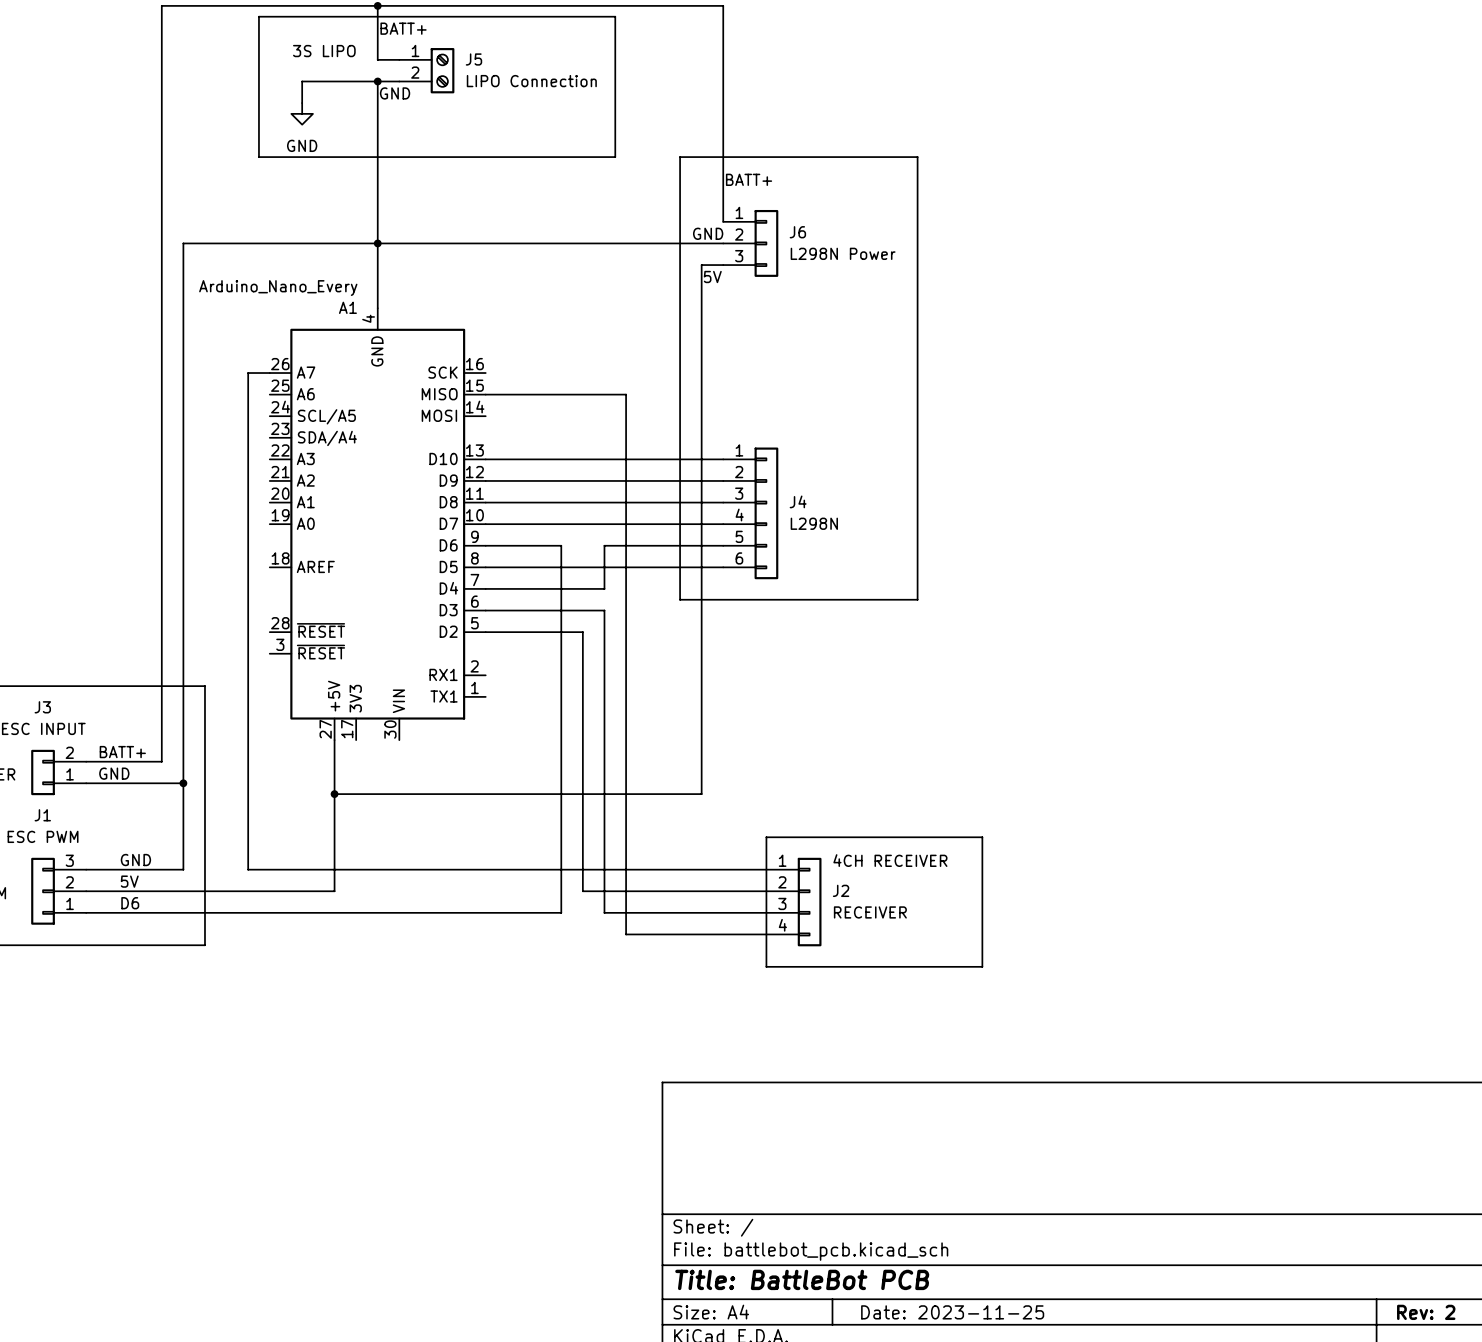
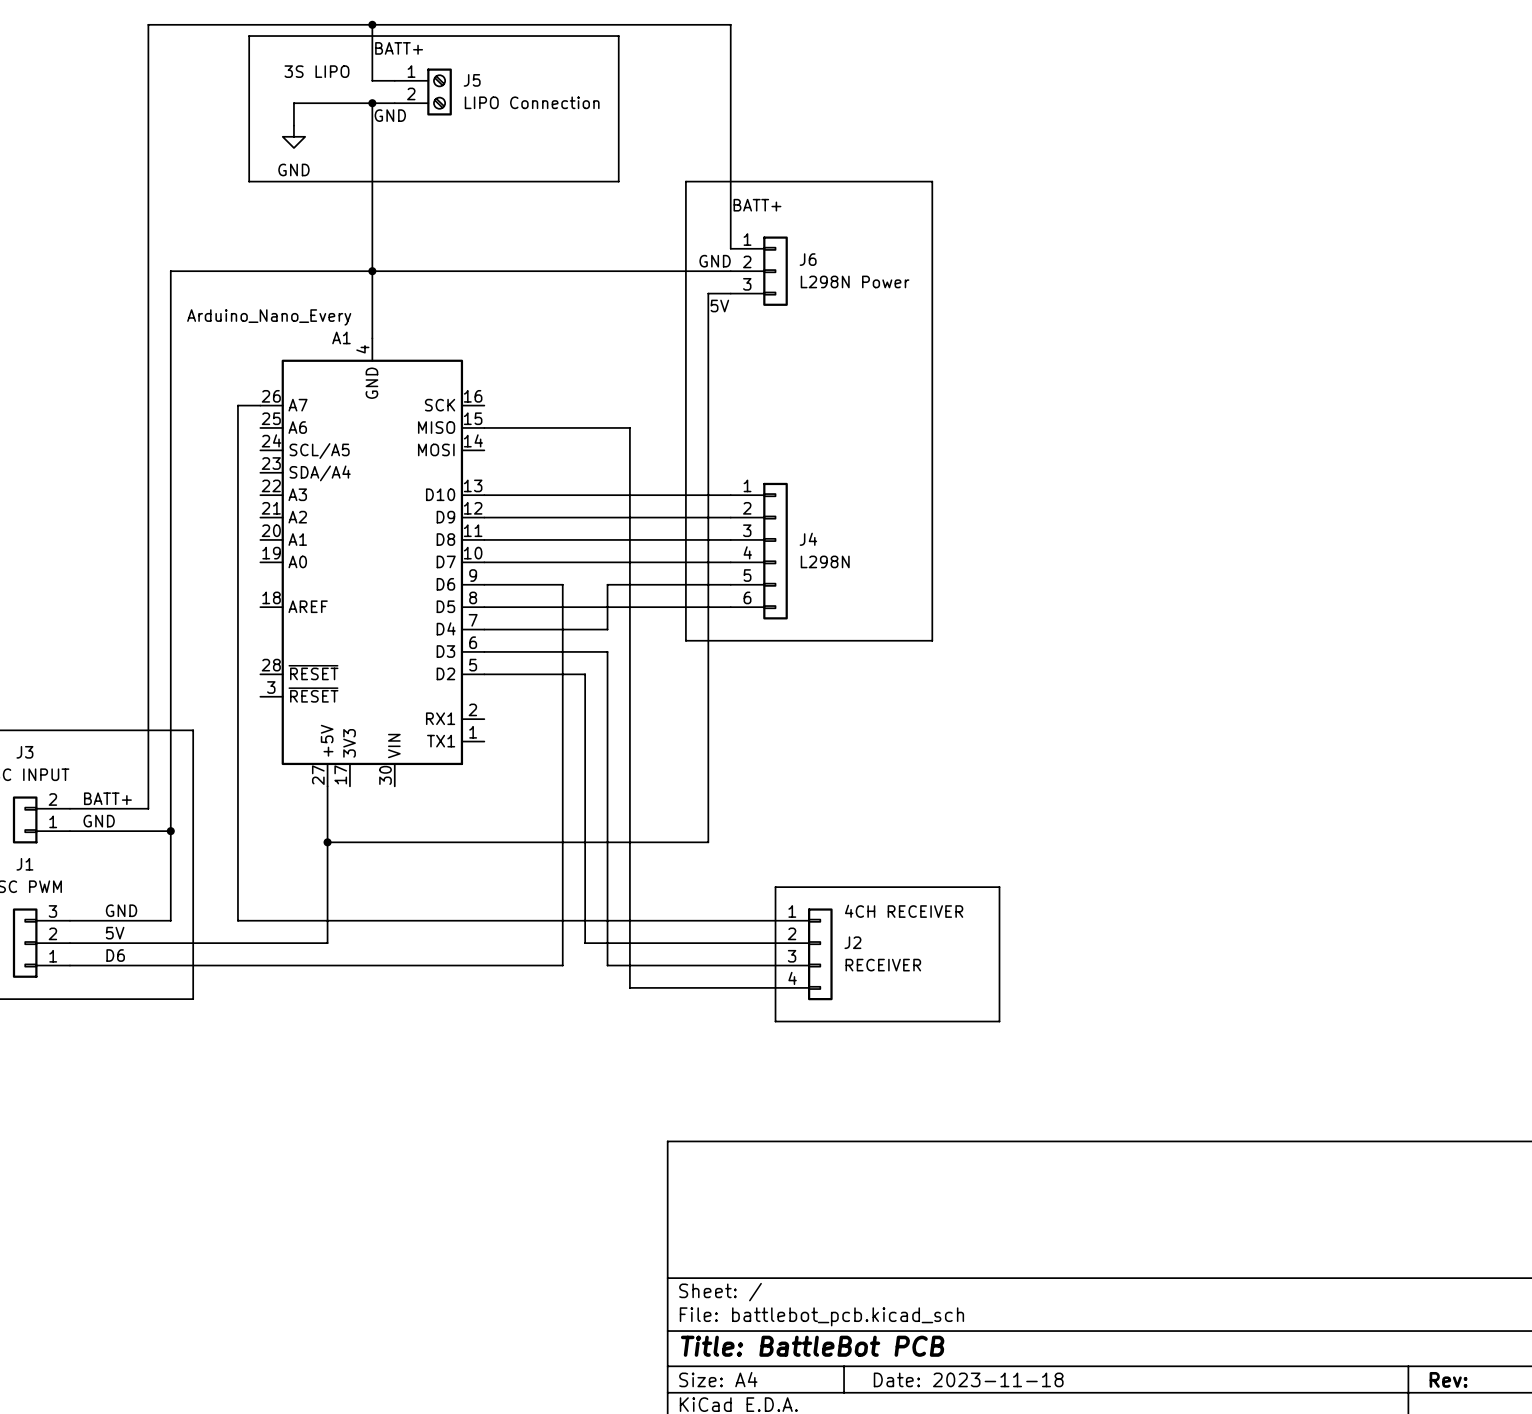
title block: Date: 2023-11-25 (952, 1312) -> Date: 2023-11-18 (968, 1379)
title block: Rev: 2 (1426, 1312) -> Rev: (1448, 1379)

